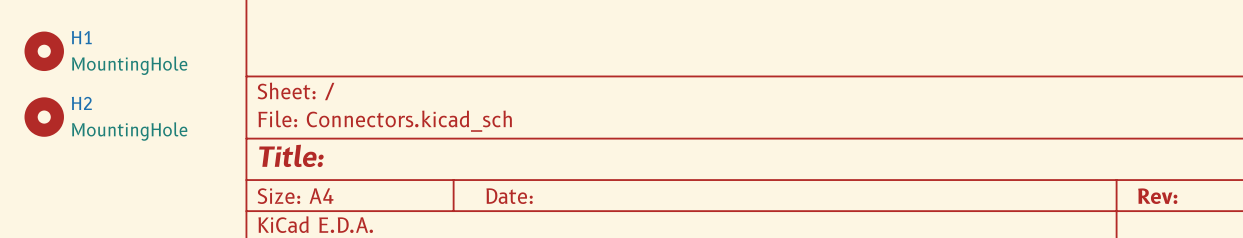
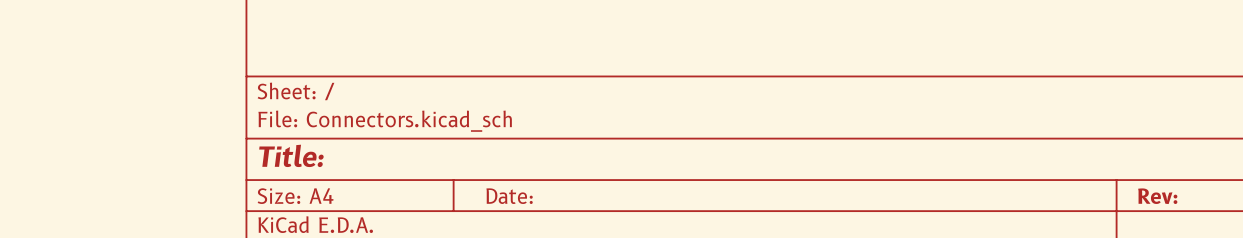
H1: MountingHole (44, 51) -> none
H2: MountingHole (44, 117) -> none

